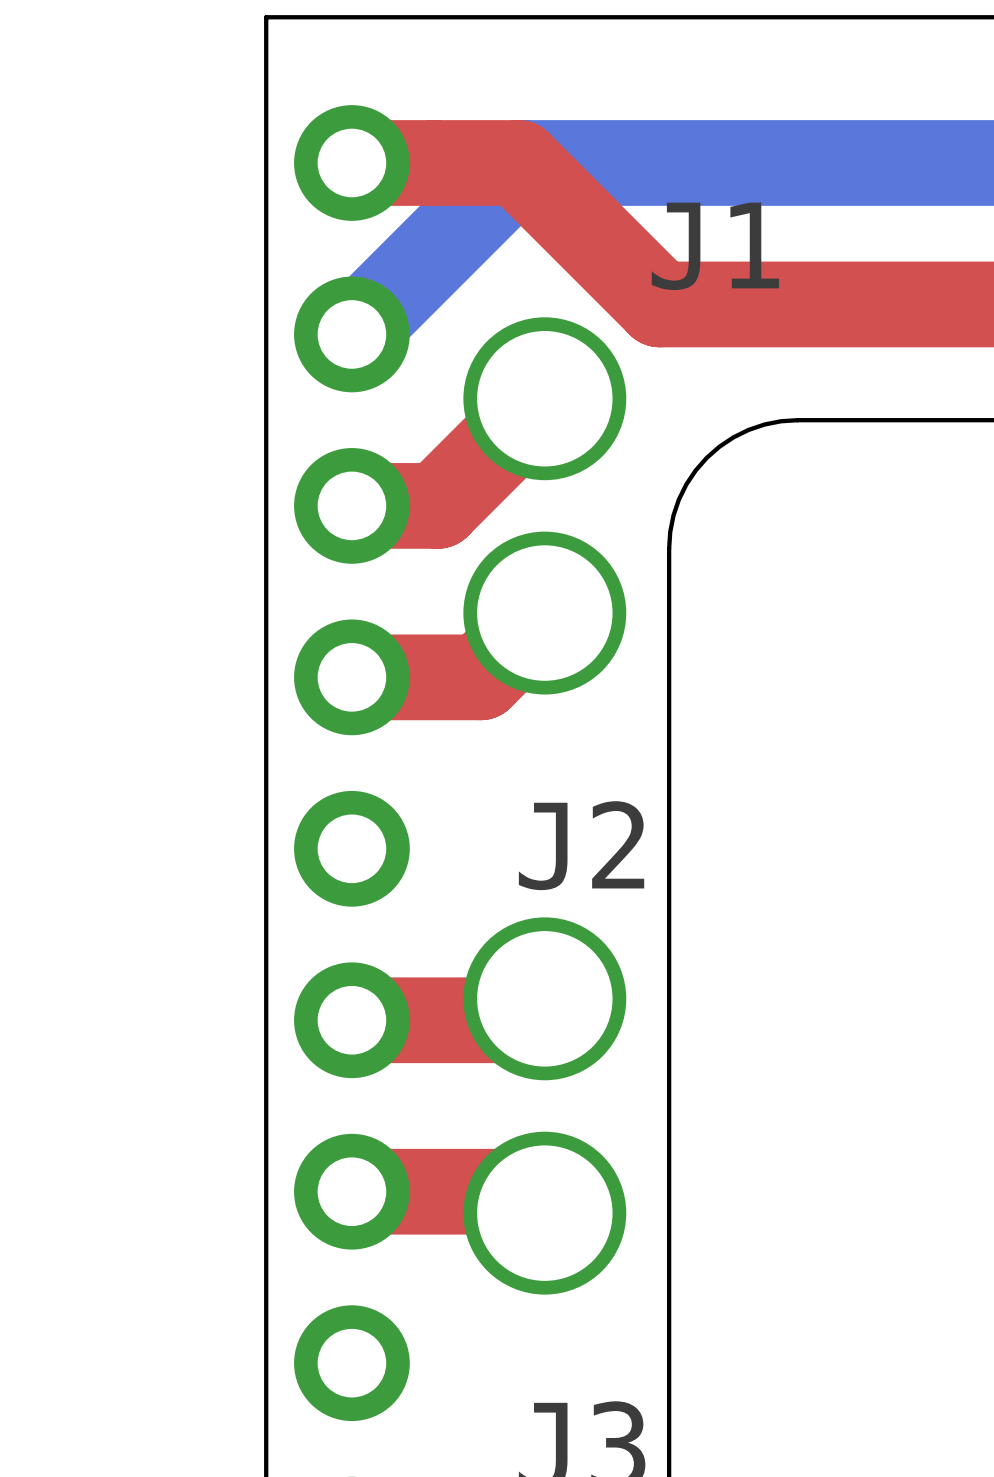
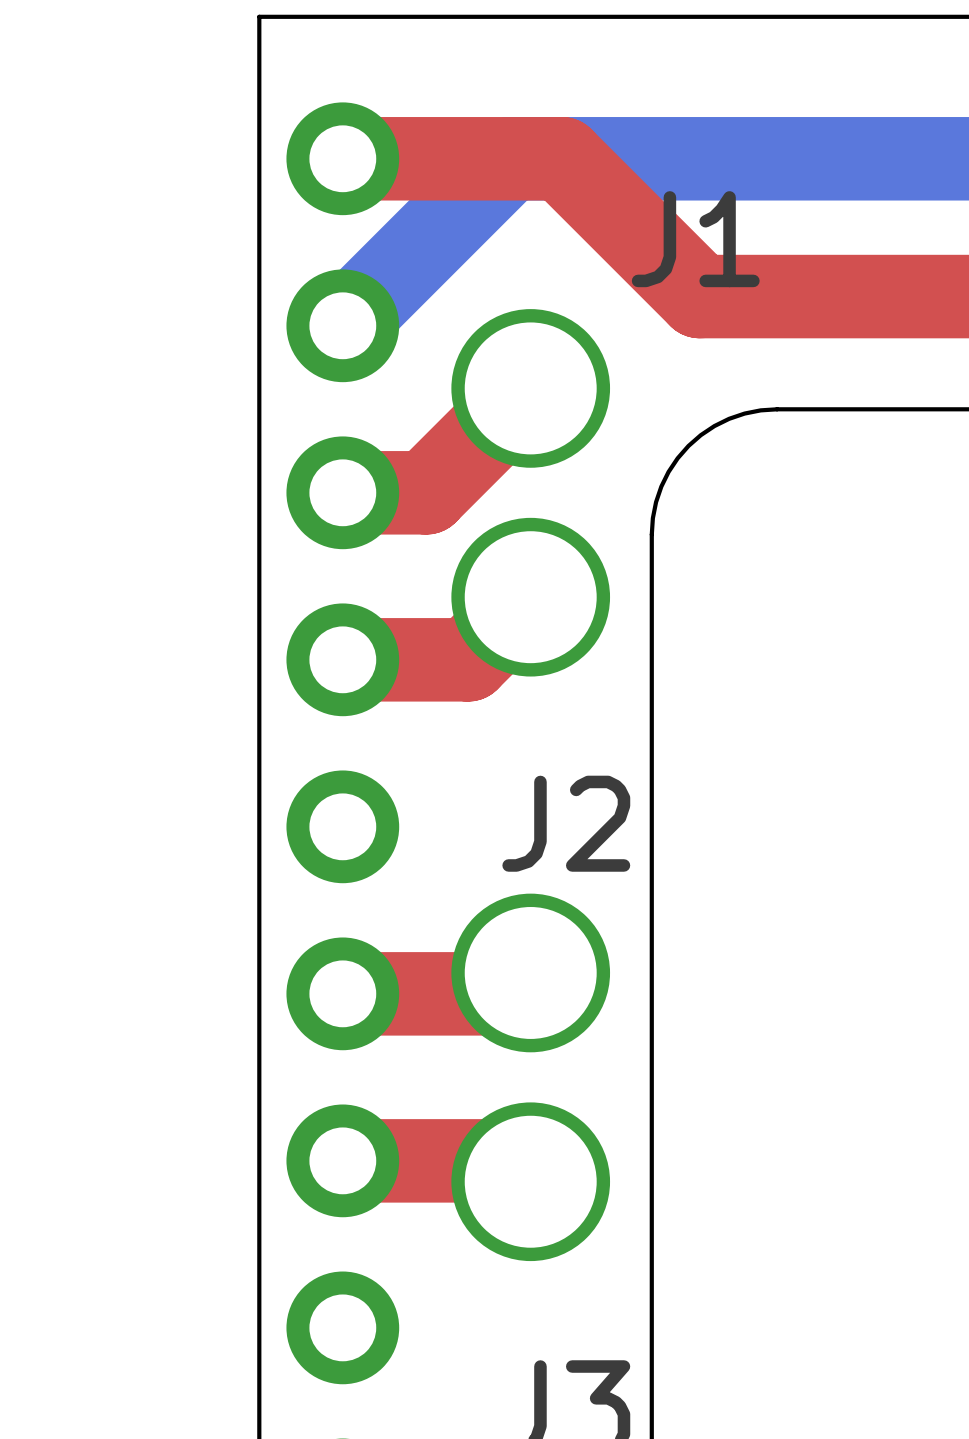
top track: (518, 162) (659, 304) (718, 304) -> (504, 158) (562, 158) (699, 296)

